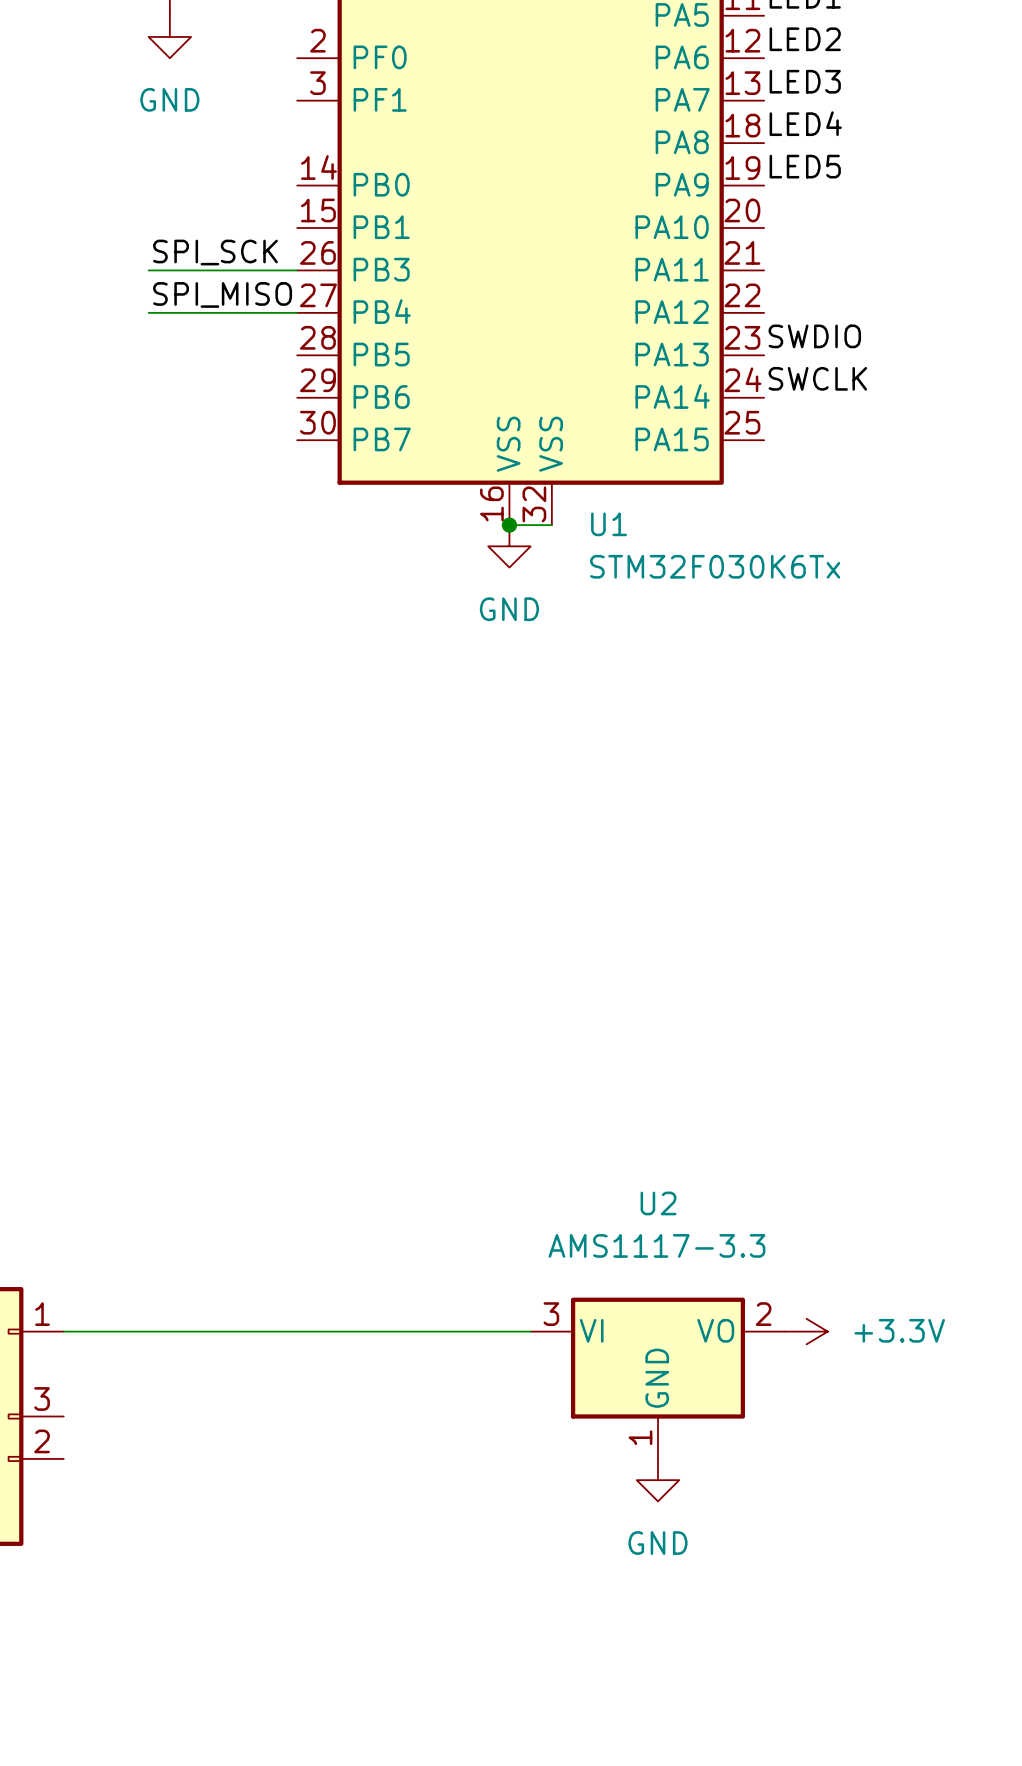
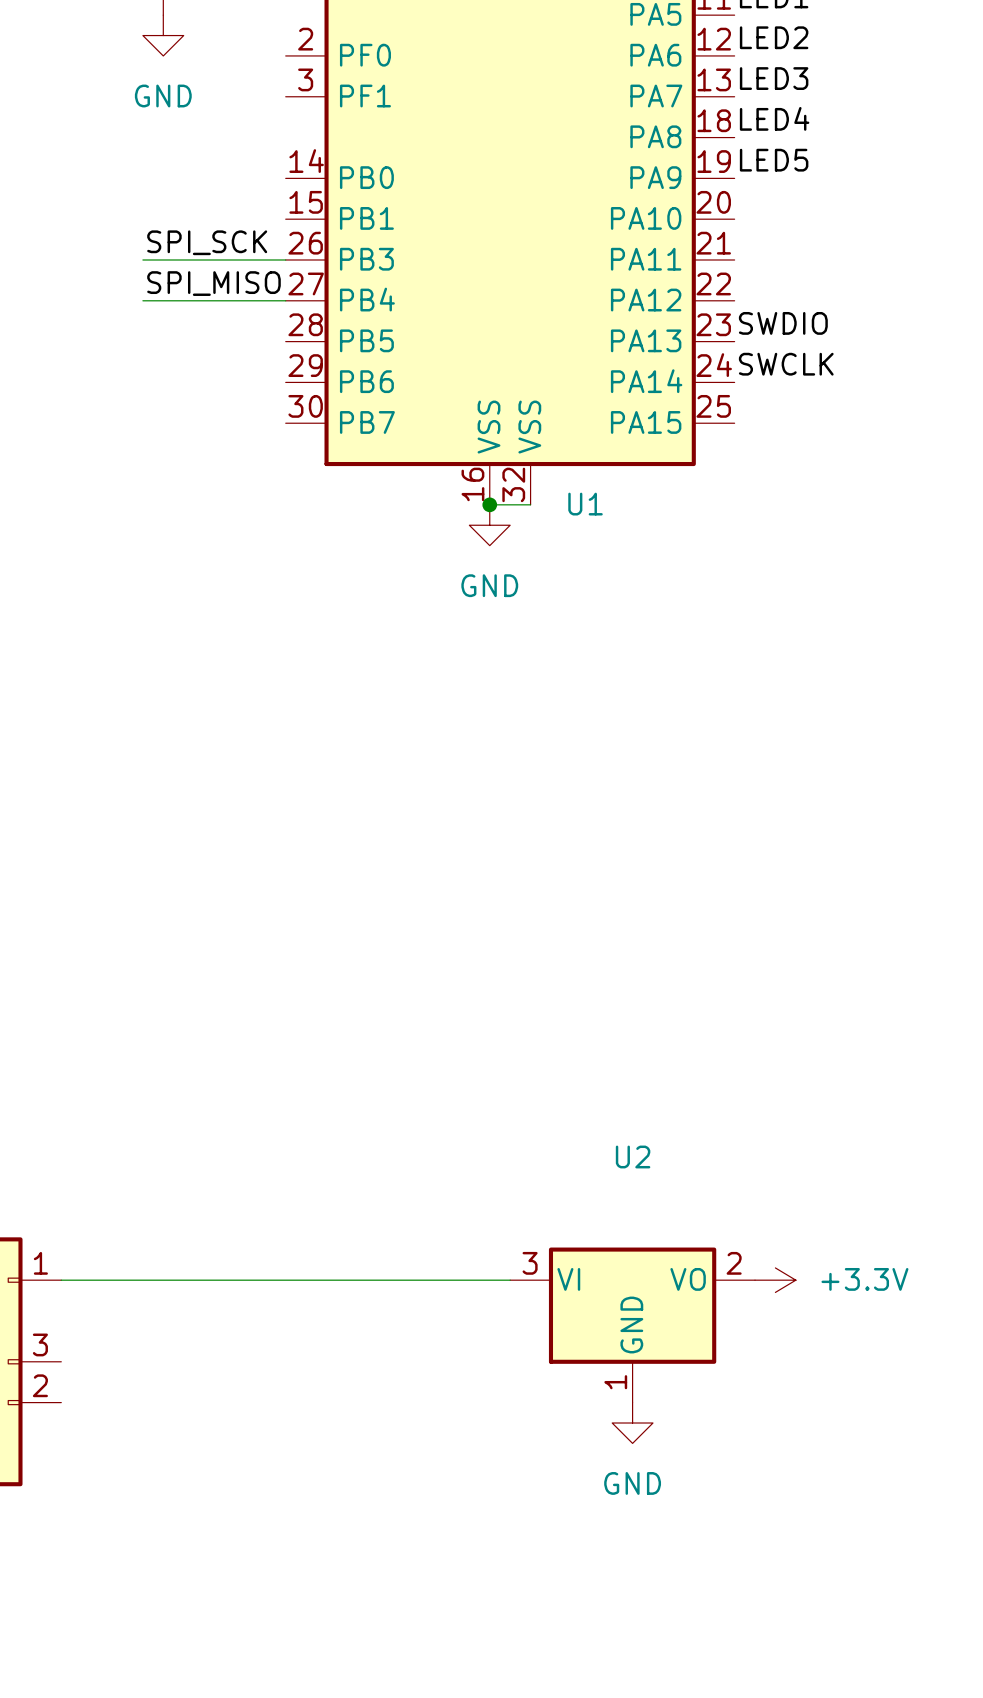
U1 value: STM32F030K6Tx (715, 566) -> none
U2 value: AMS1117-3.3 (656, 1245) -> none

